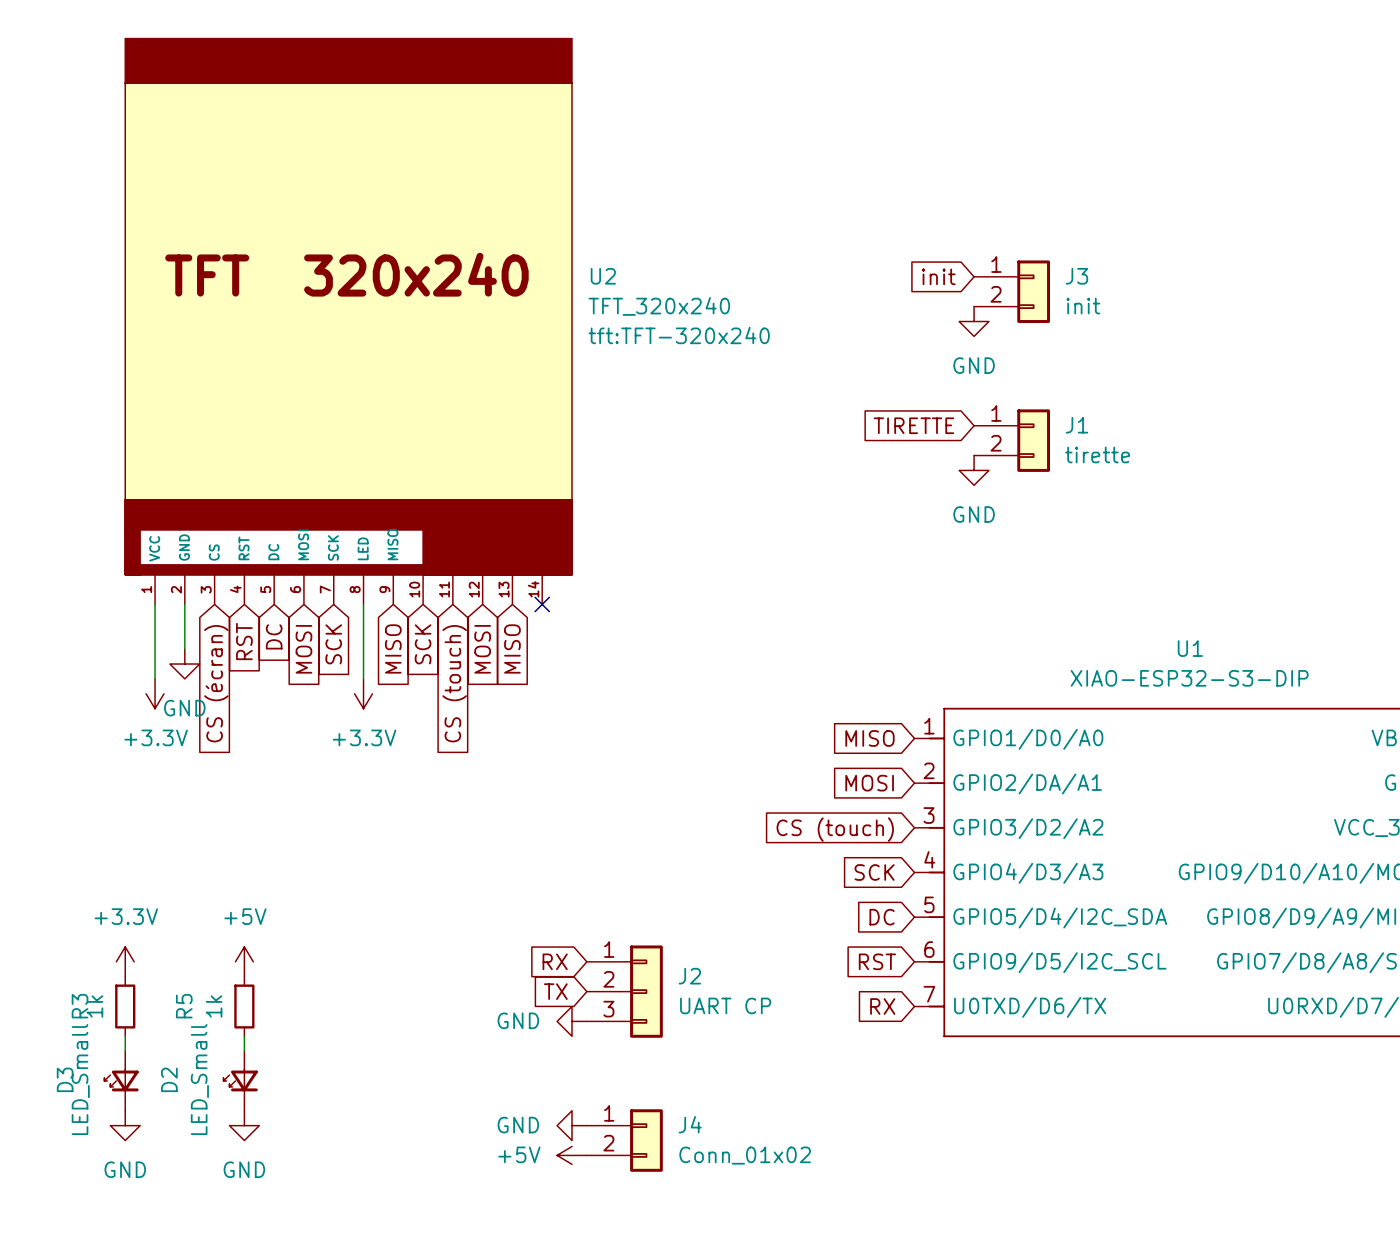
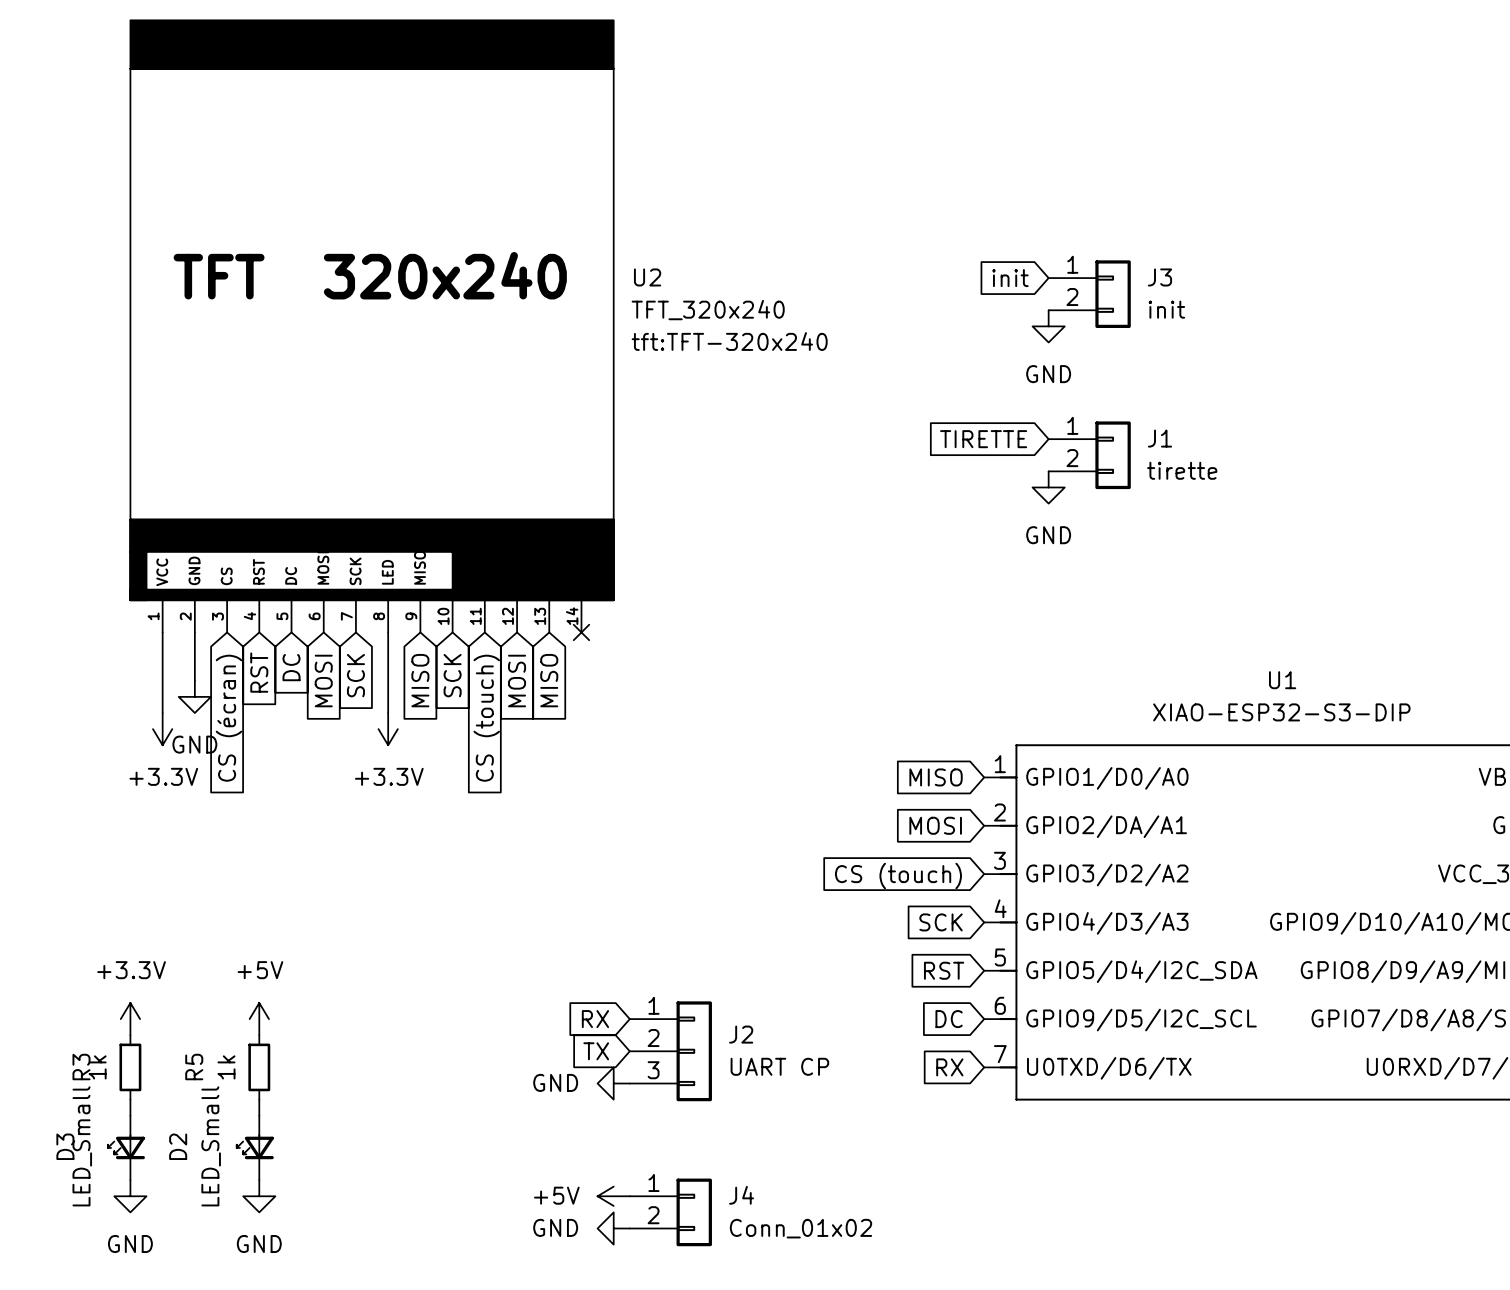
global label: DC (882, 917) -> RST (944, 970)
global label: RST (877, 961) -> DC (949, 1019)
power symbol: GND (572, 1125) -> +5V (613, 1196)
power symbol: +5V (572, 1155) -> GND (613, 1228)

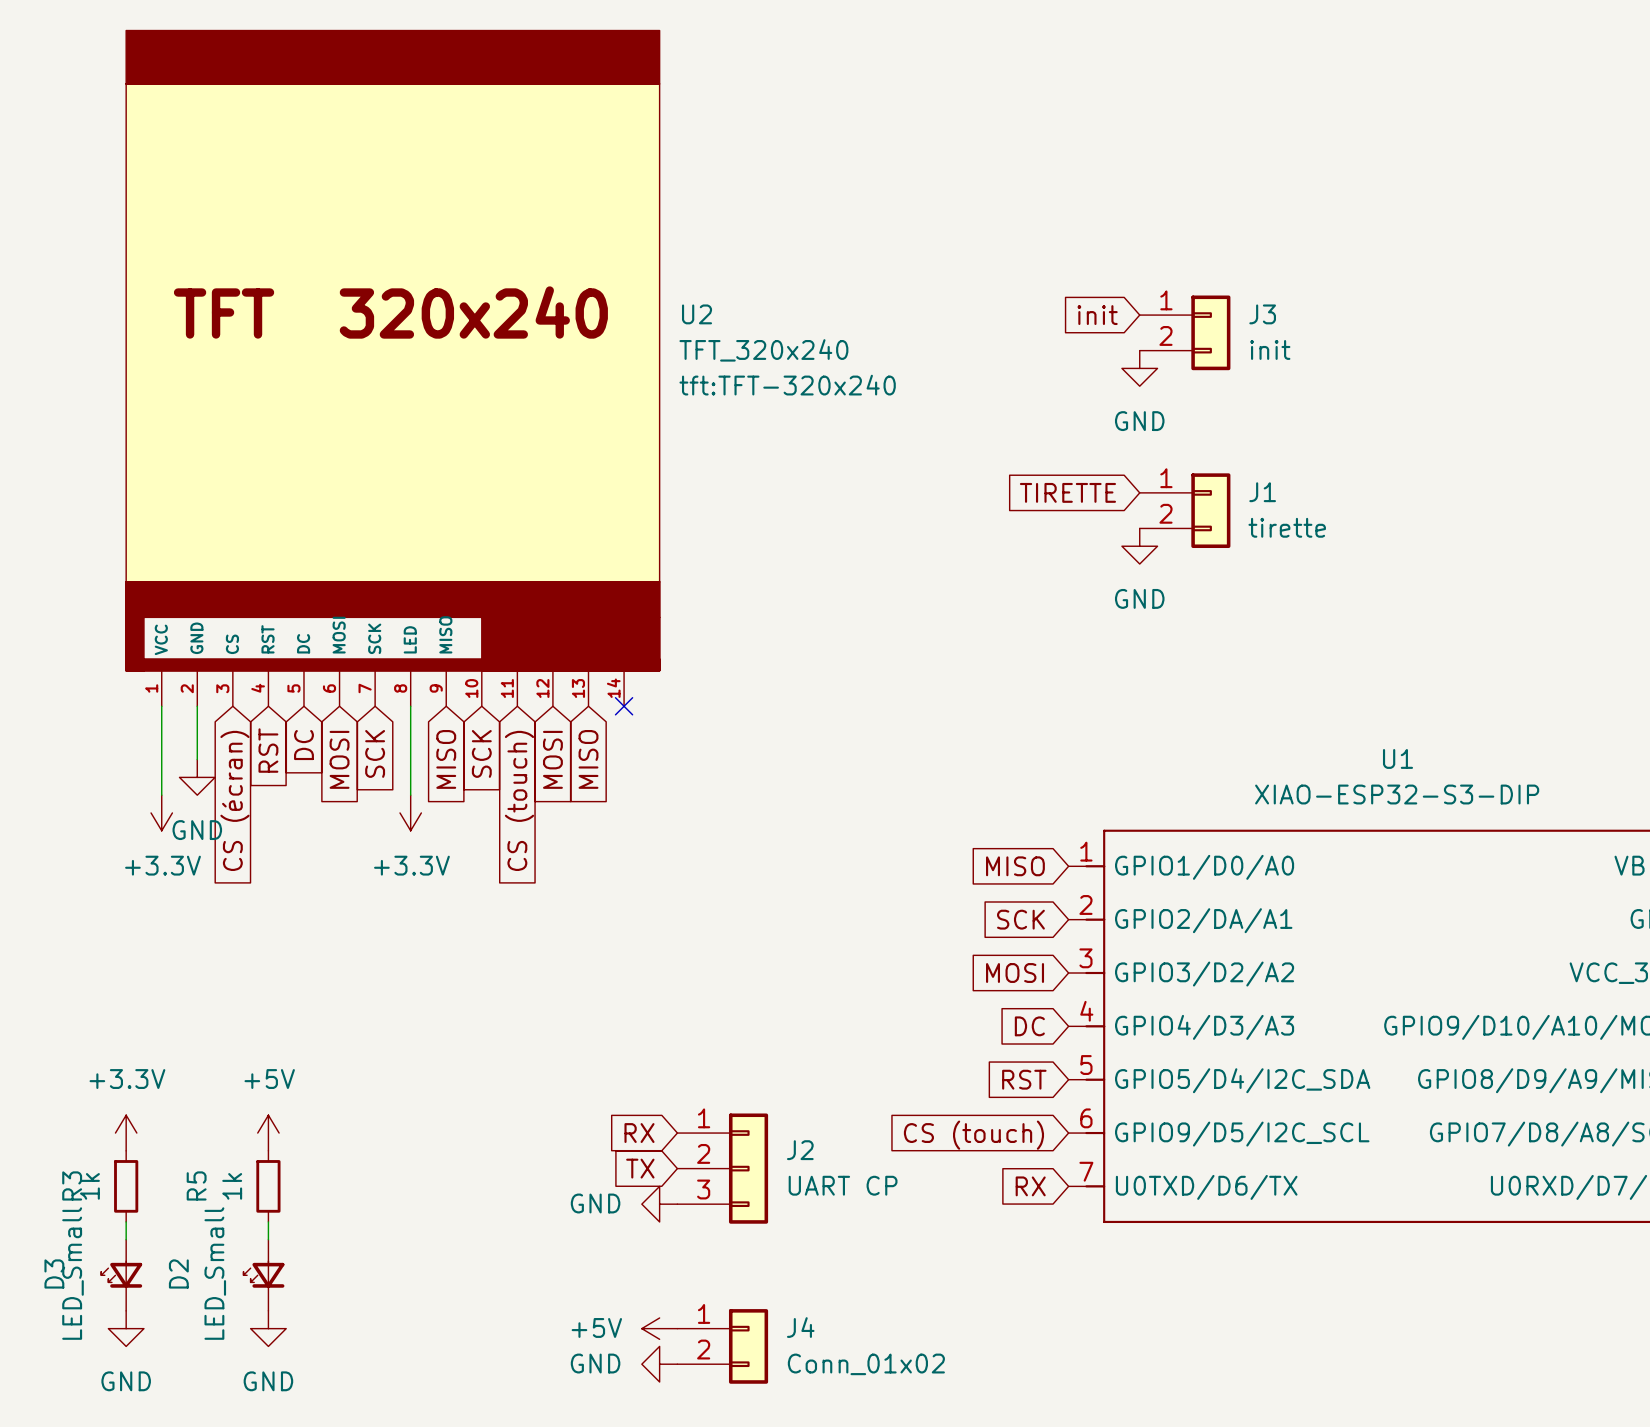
global label: MOSI (935, 825) -> SCK (1020, 919)
global label: CS (touch) (898, 876) -> MOSI (1015, 973)
global label: SCK (941, 922) -> DC (1029, 1026)
global label: DC (949, 1019) -> CS (touch) (973, 1135)

